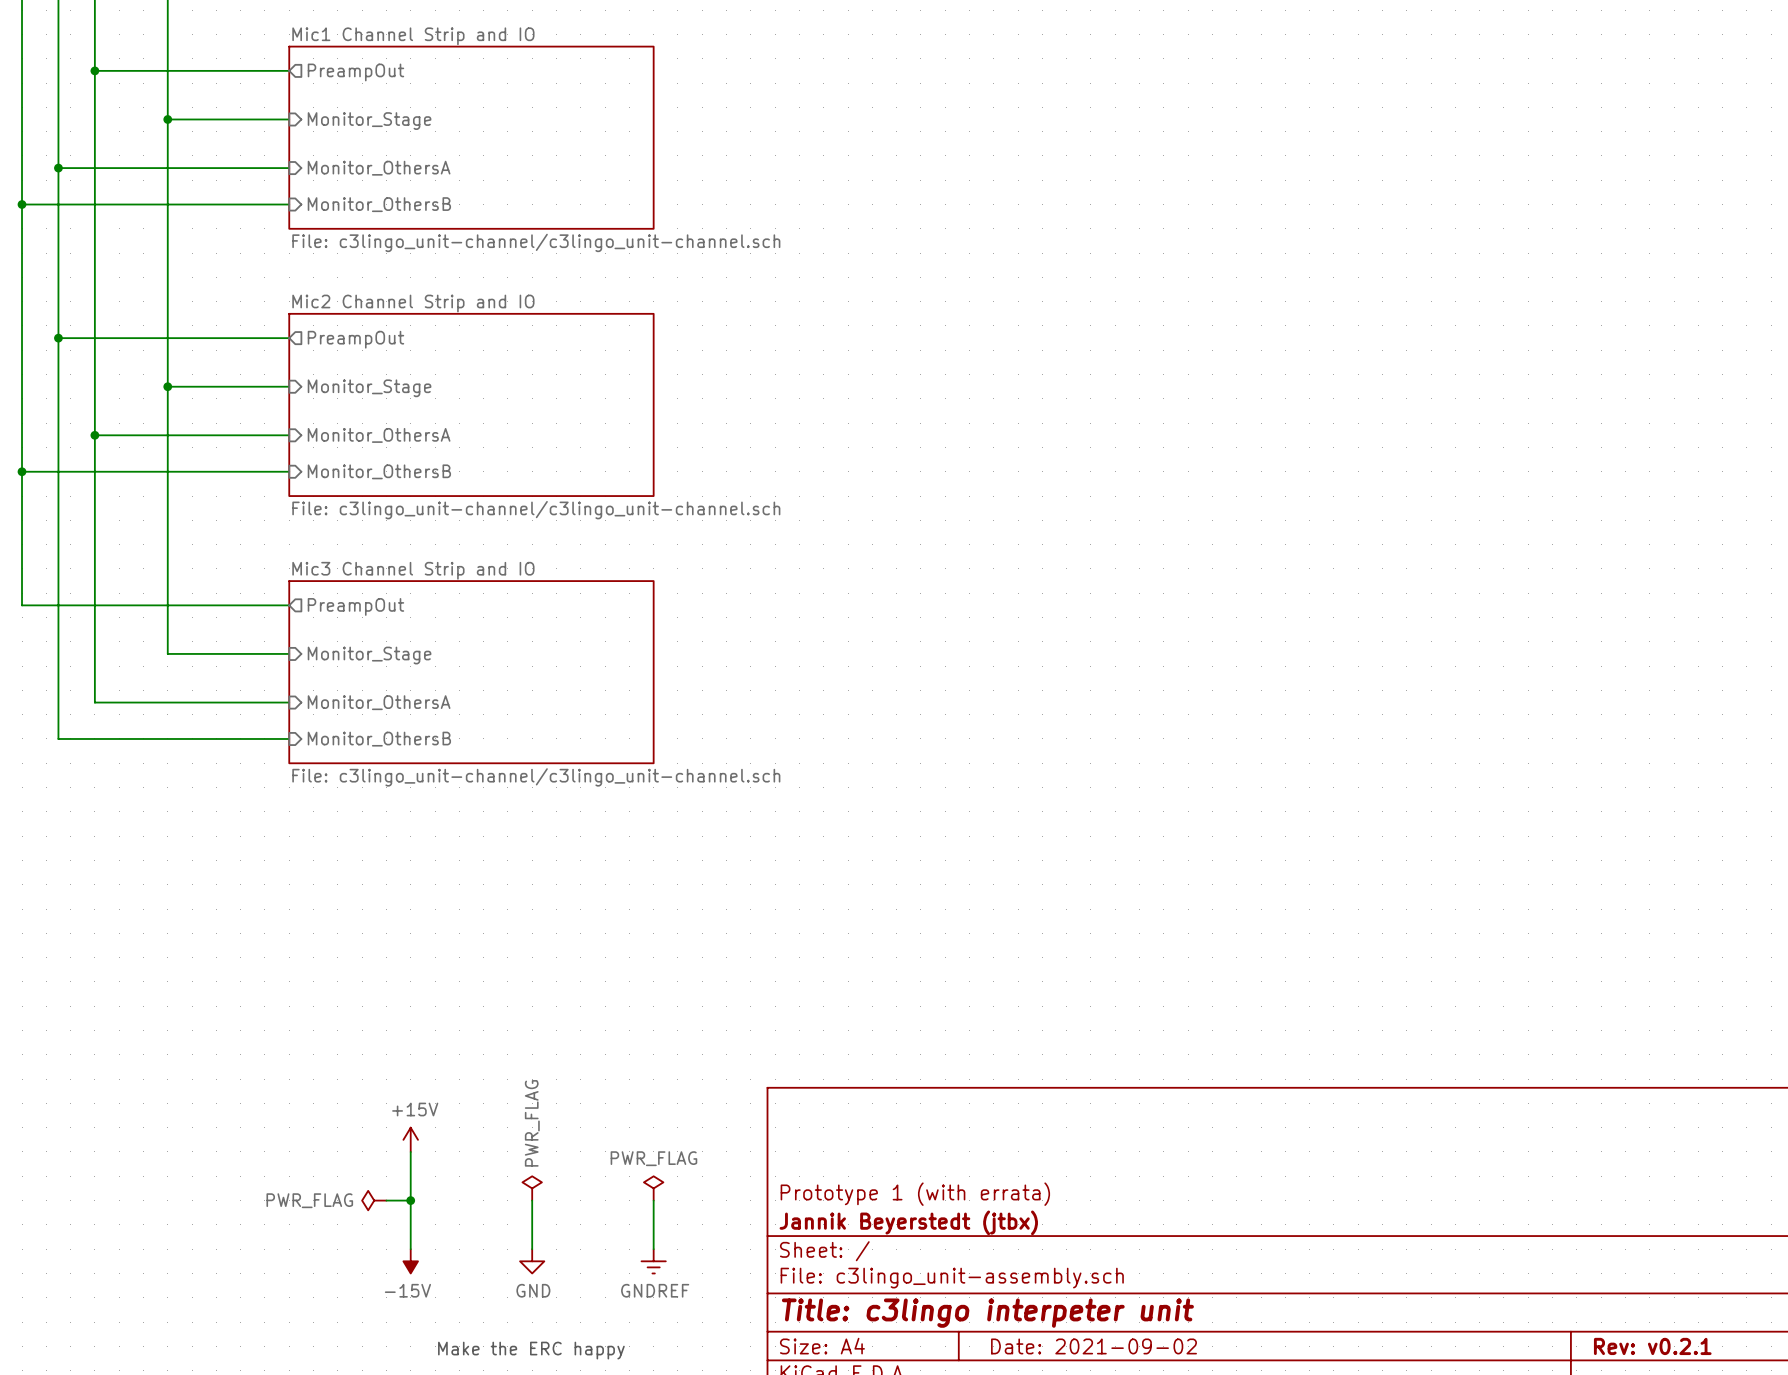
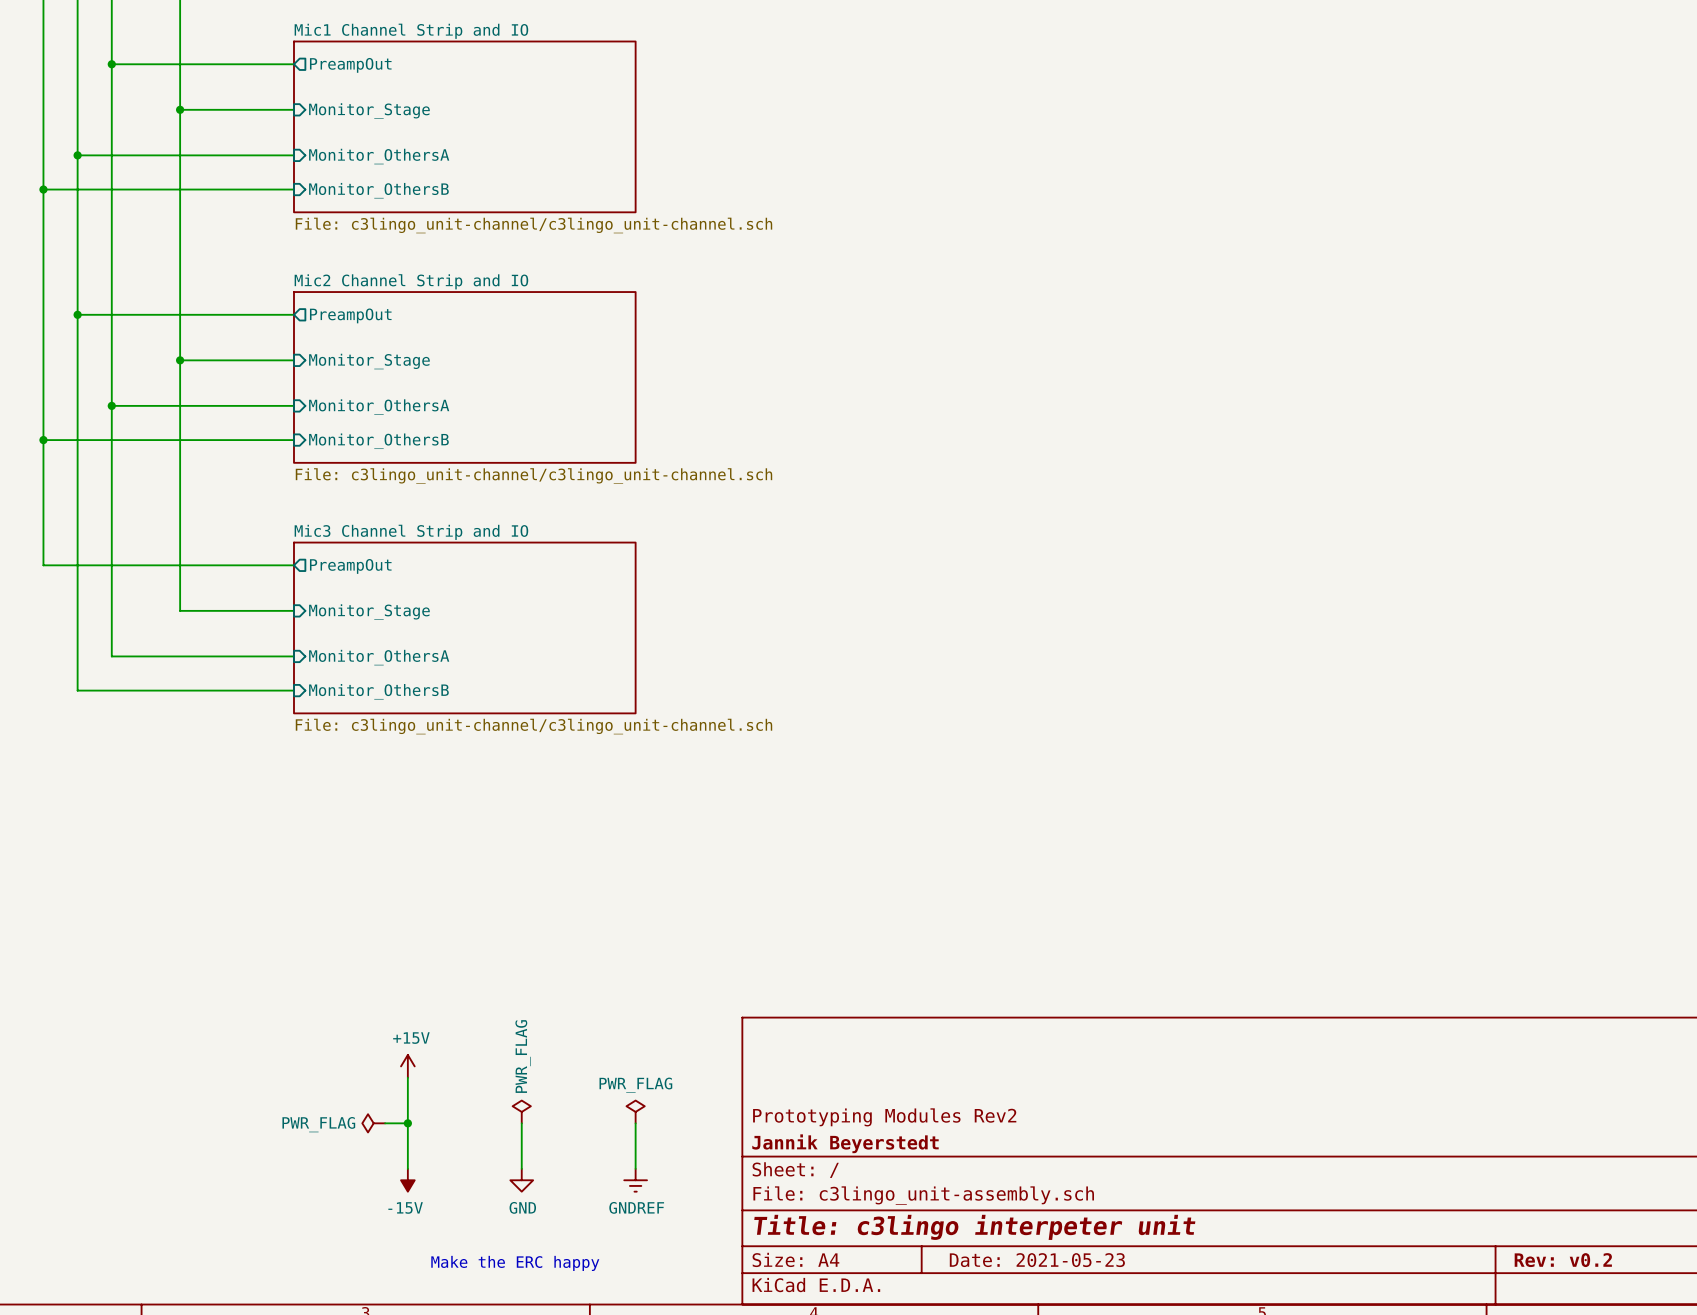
title block: Prototype 1 (with errata) (915, 1194) -> Prototyping Modules Rev2 (884, 1117)
title block: Jannik Beyerstedt (jtbx) (908, 1222) -> Jannik Beyerstedt (845, 1143)
title block: Date: 2021-09-02 (1094, 1346) -> Date: 2021-05-23 (1037, 1260)
title block: Rev: v0.2.1 (1652, 1346) -> Rev: v0.2 (1563, 1260)

